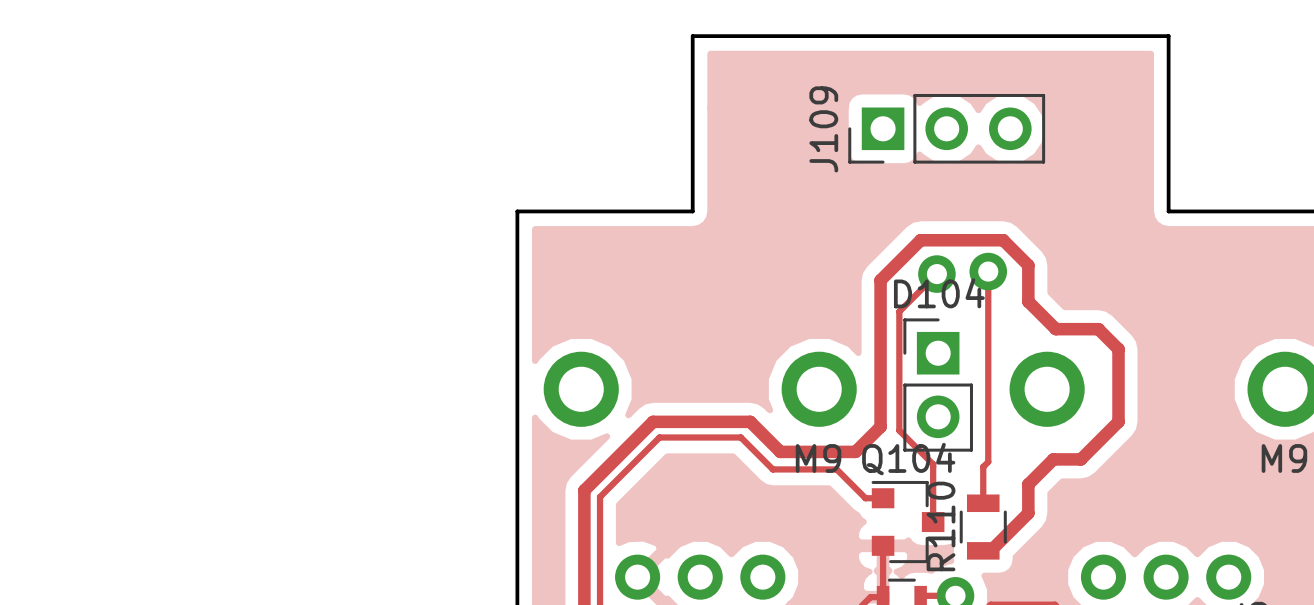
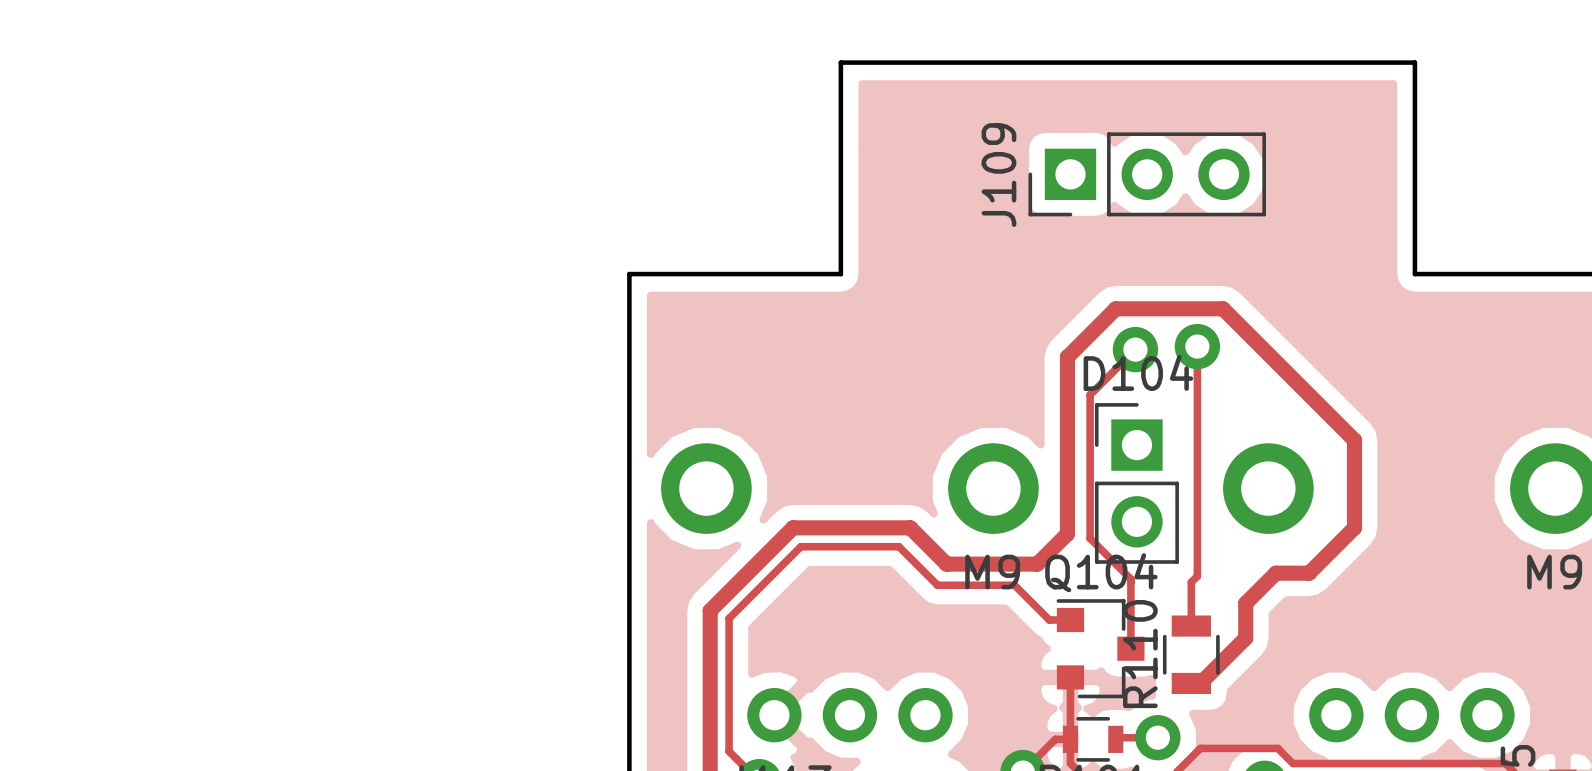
track: (1003, 240) (1028, 265) (1028, 301) (1055, 329) (1098, 329) -> (1215, 308) (1223, 308) (1330, 416)

